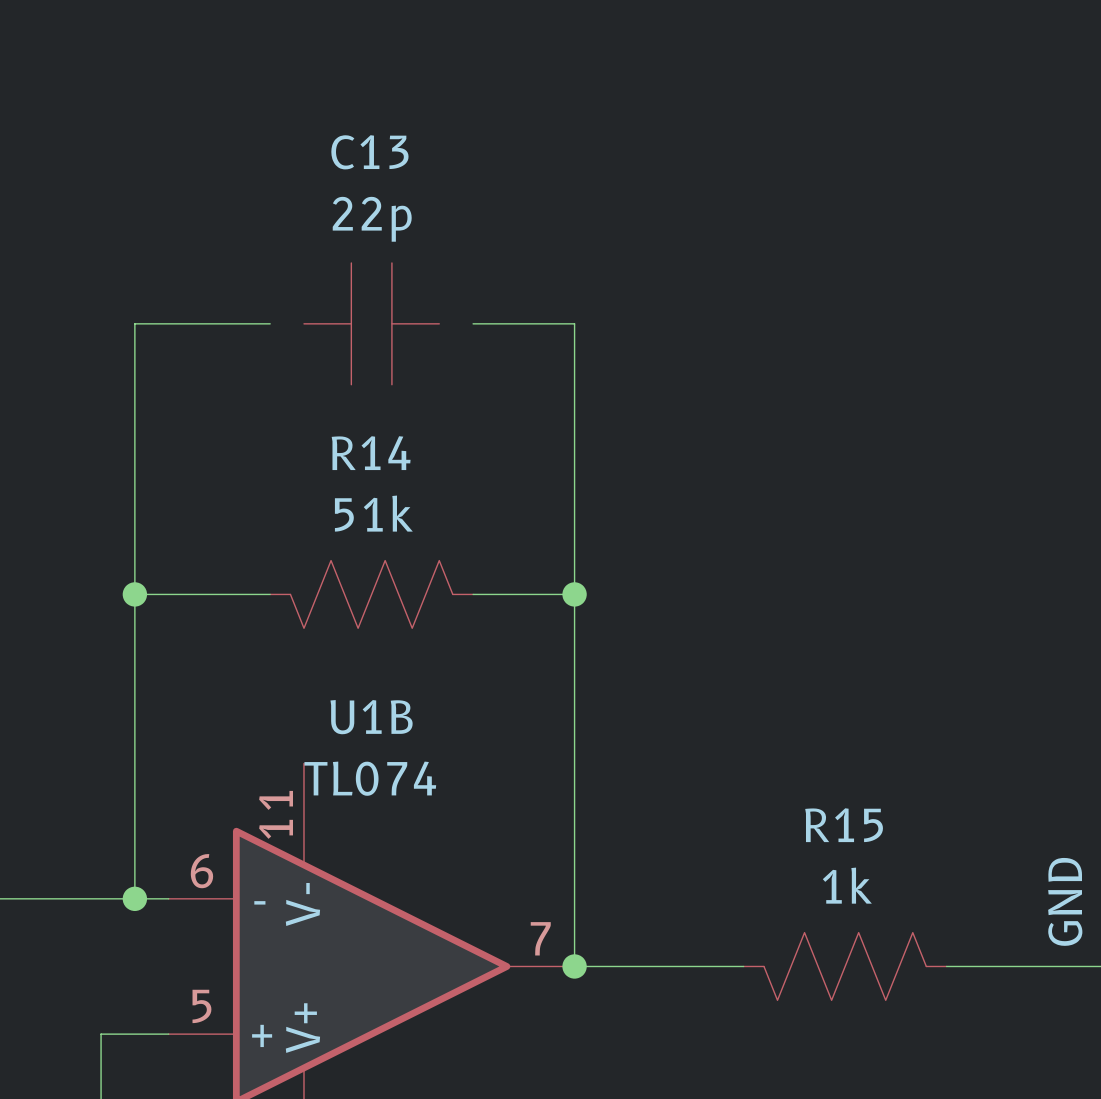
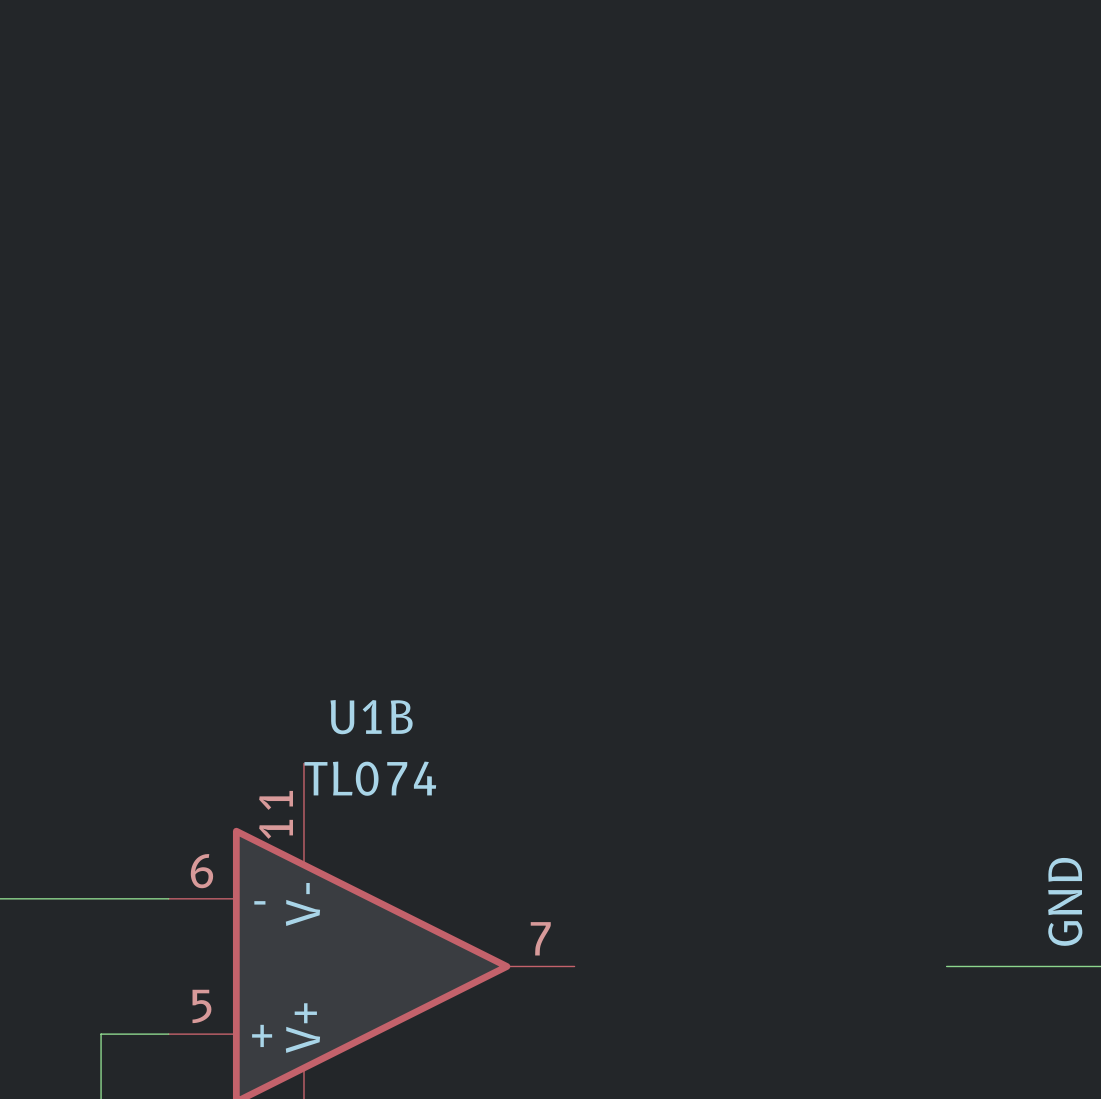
wire: (270, 323) (134, 323) (134, 898) -> none
C13: 22p (371, 323) -> none
wire: (473, 323) (574, 323) (574, 966) (743, 966) -> none
wire: (134, 594) (270, 594) -> none
junction: (134, 594) -> none
R14: 51k (371, 594) -> none
wire: (473, 594) (574, 594) -> none
junction: (574, 594) -> none
junction: (134, 898) -> none
junction: (574, 966) -> none
R15: 1k (845, 966) -> none

